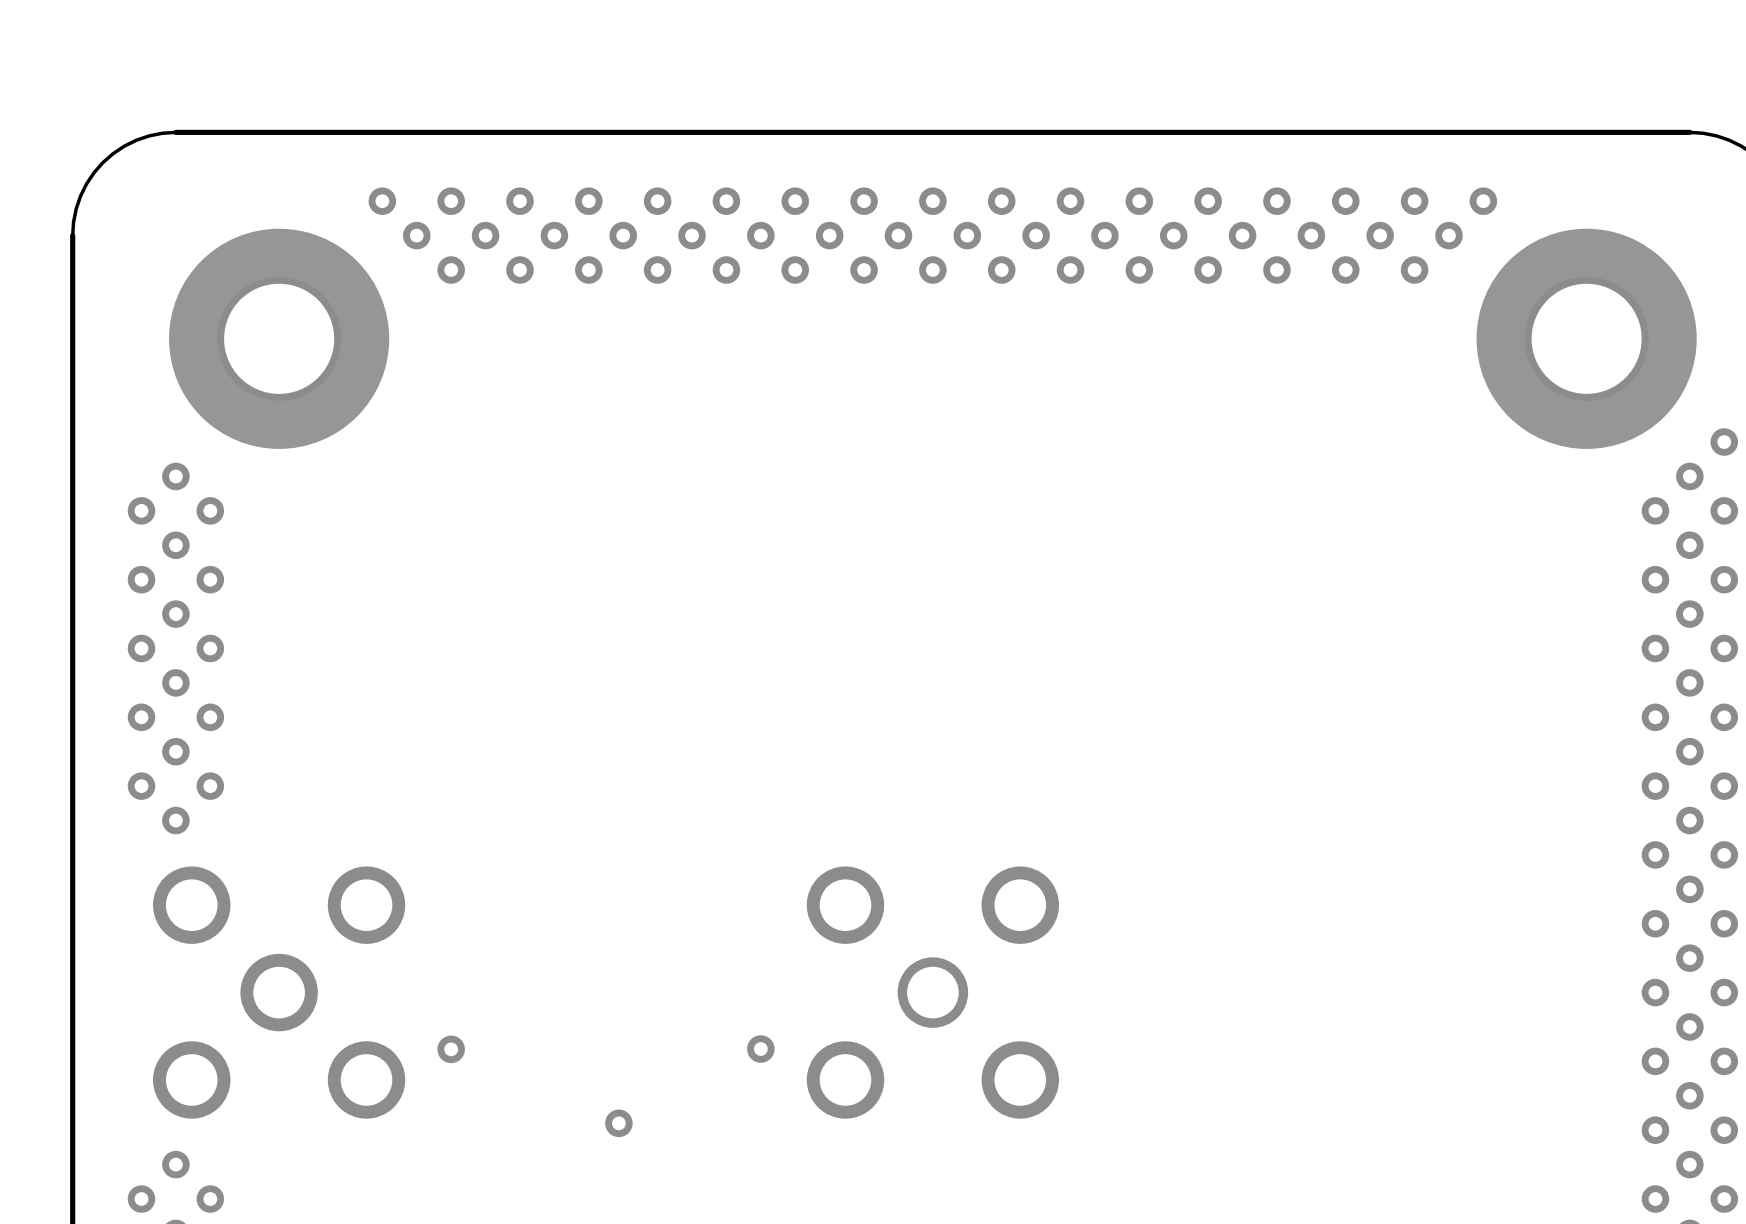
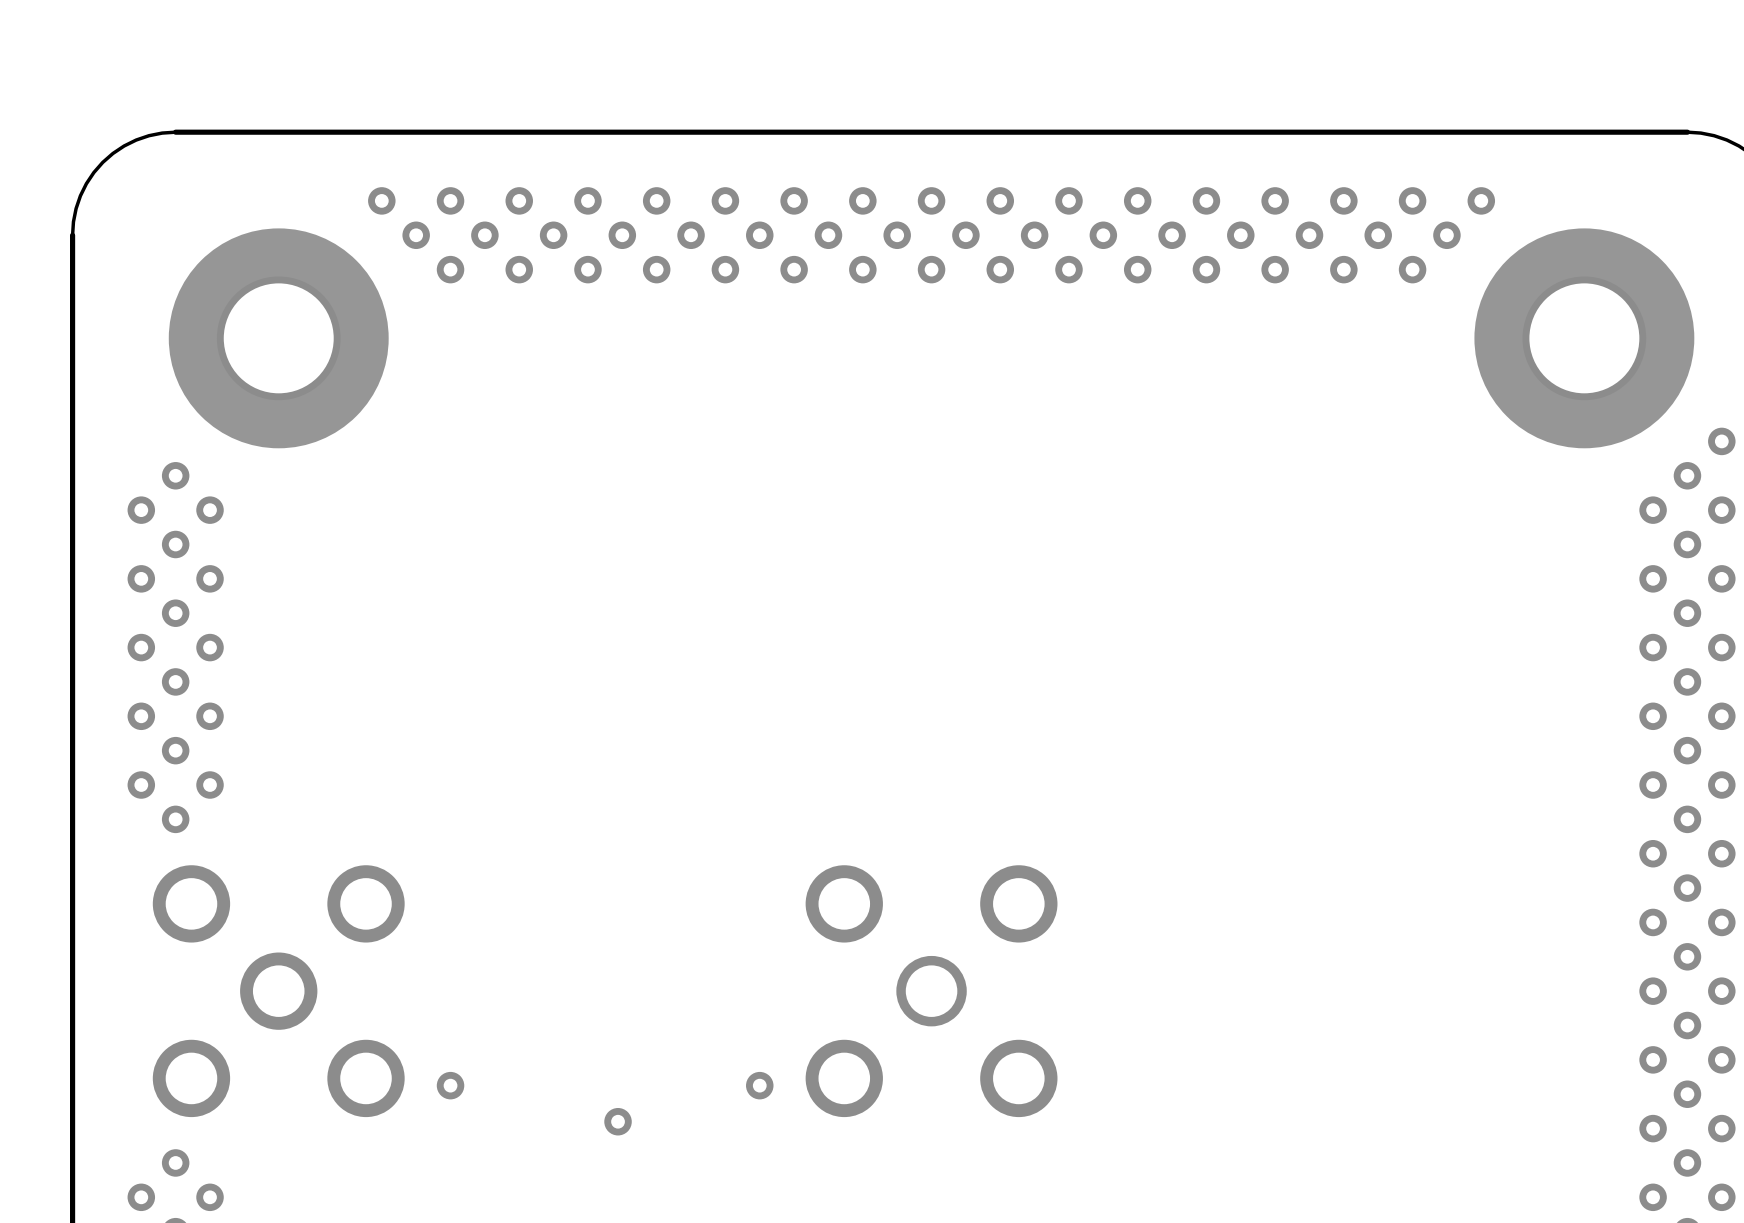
via position: (451, 1049) -> (450, 1085)
via position: (760, 1049) -> (759, 1085)

